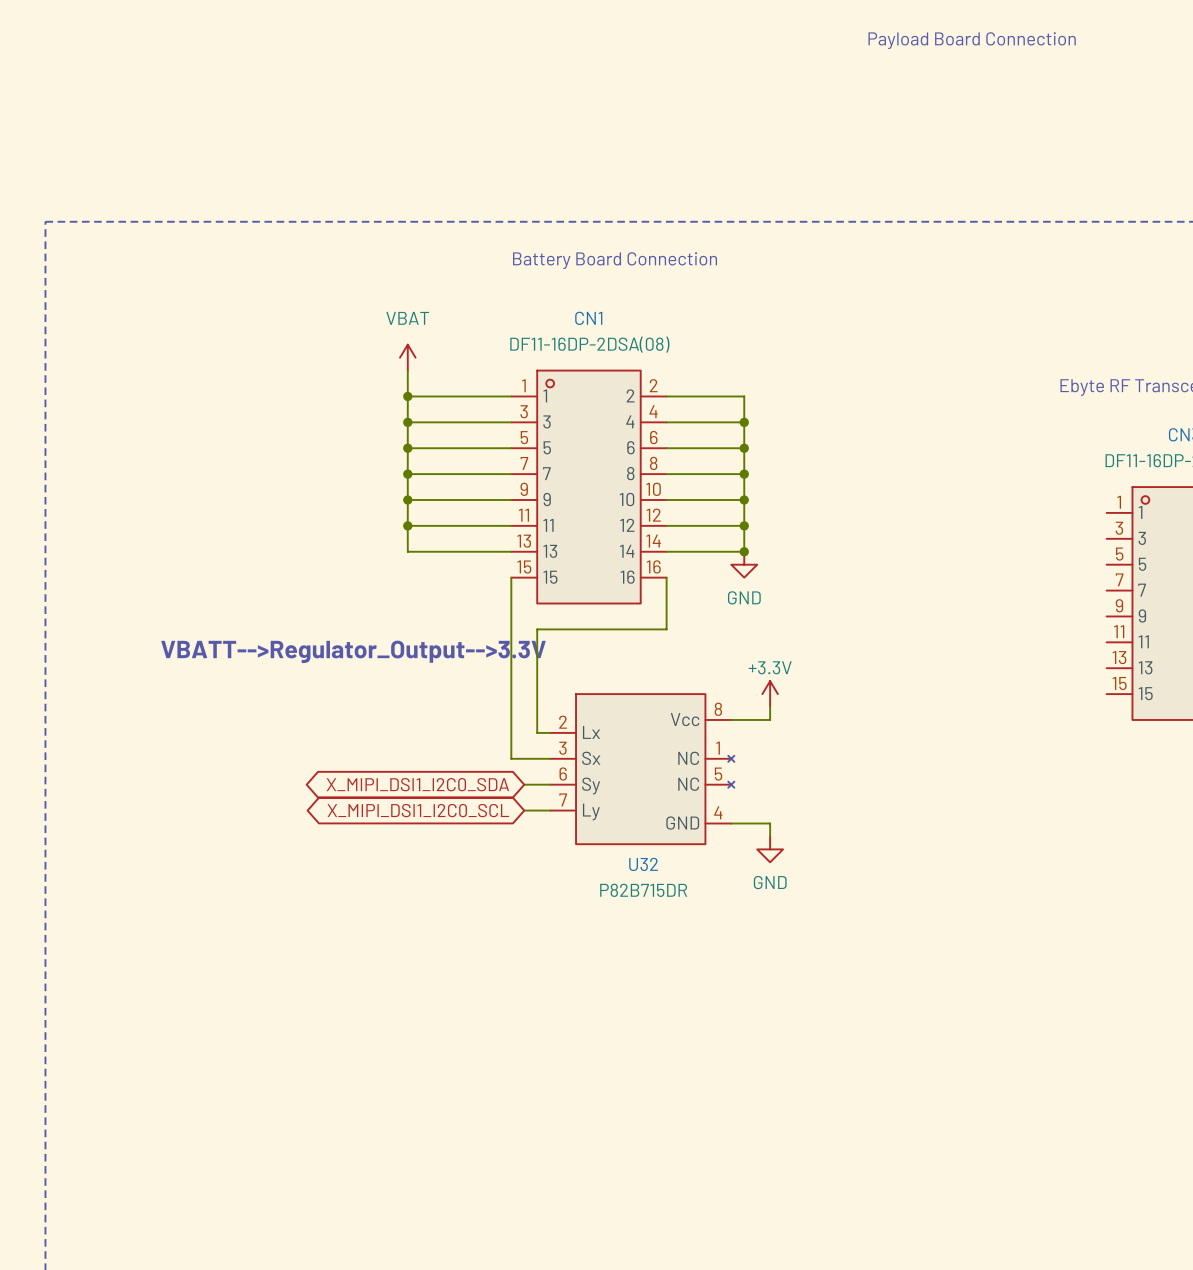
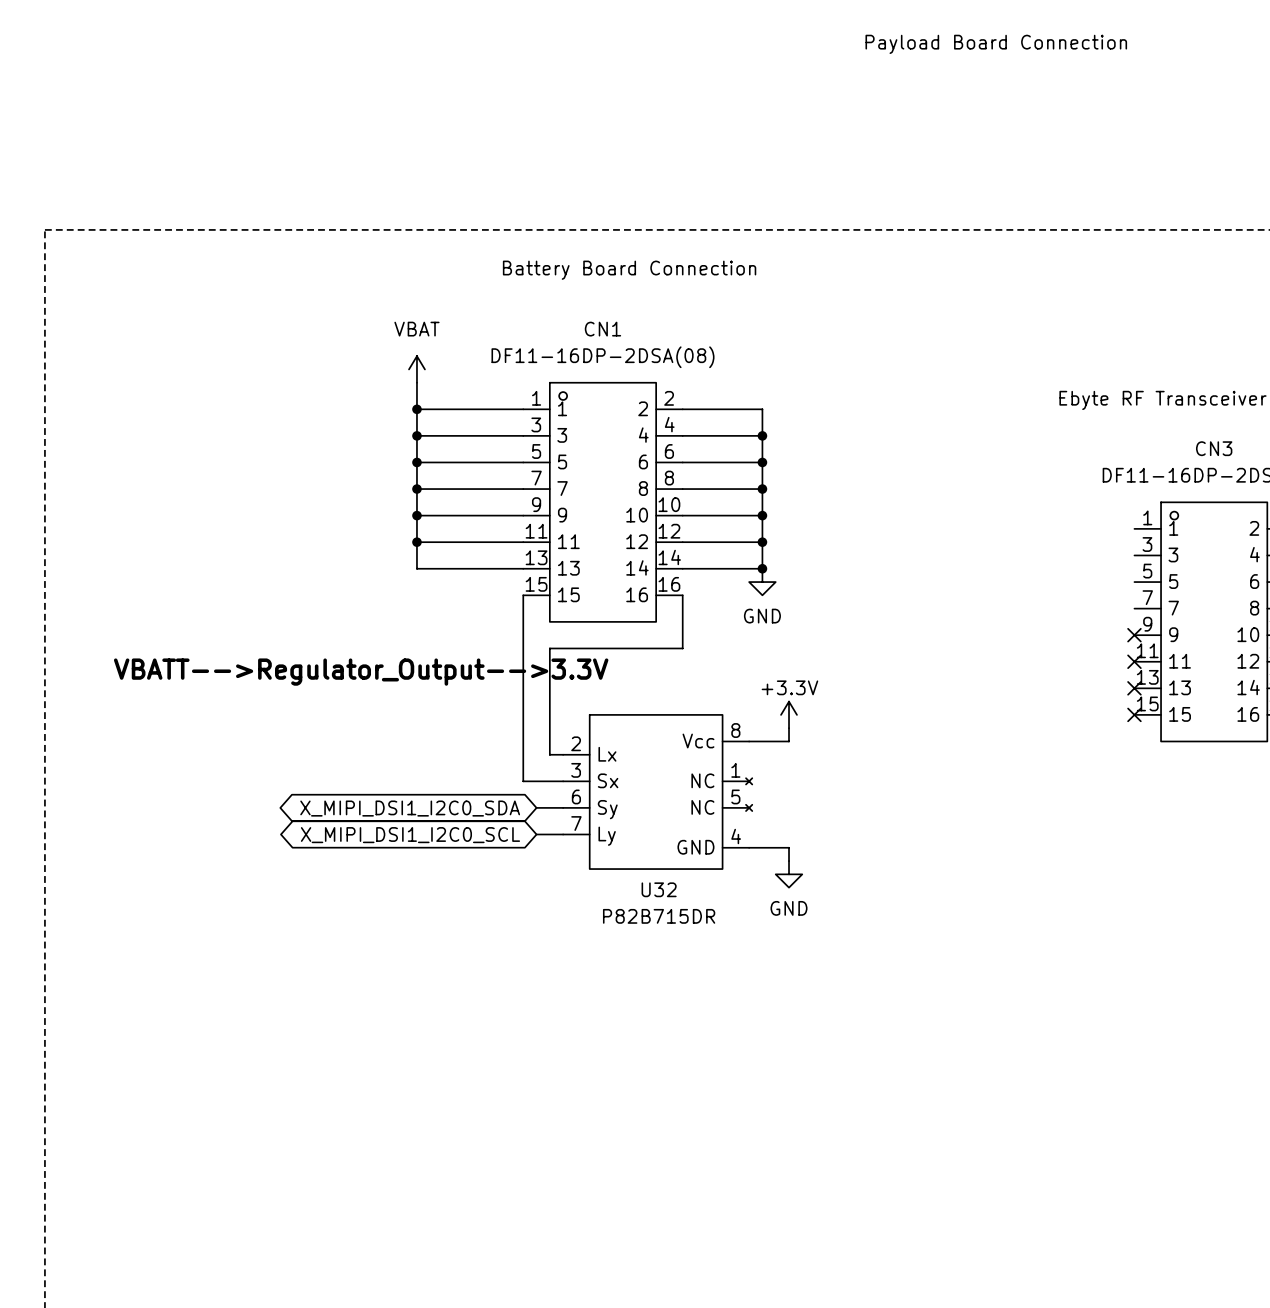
no-connect mark: none -> (1134, 635)
no-connect mark: none -> (1134, 661)
no-connect mark: none -> (1134, 688)
no-connect mark: none -> (1134, 714)

